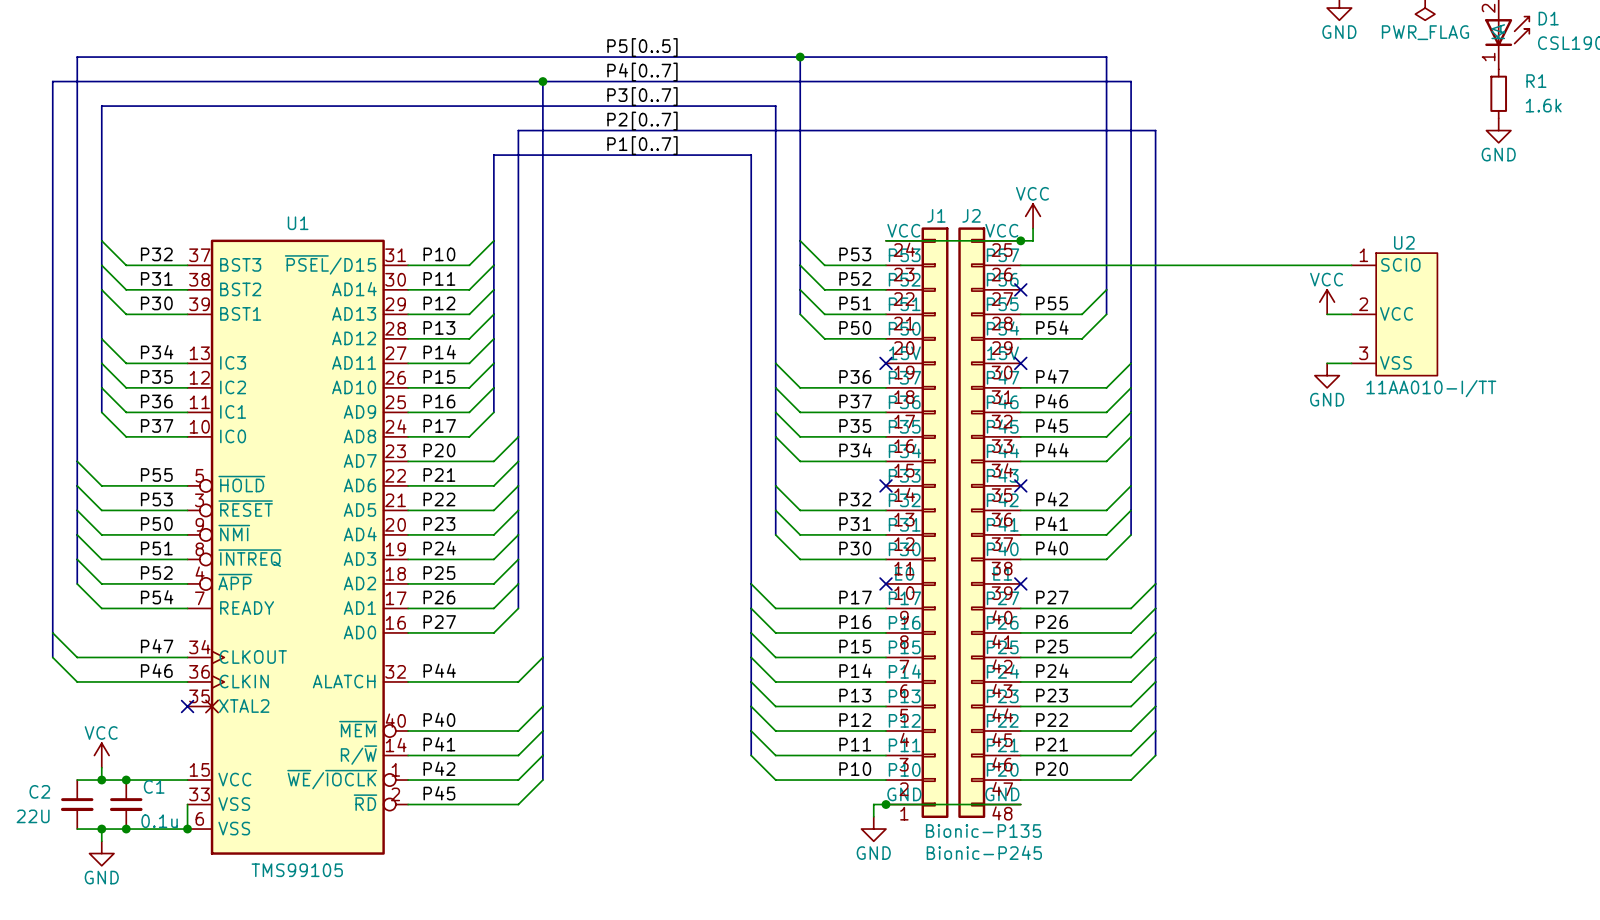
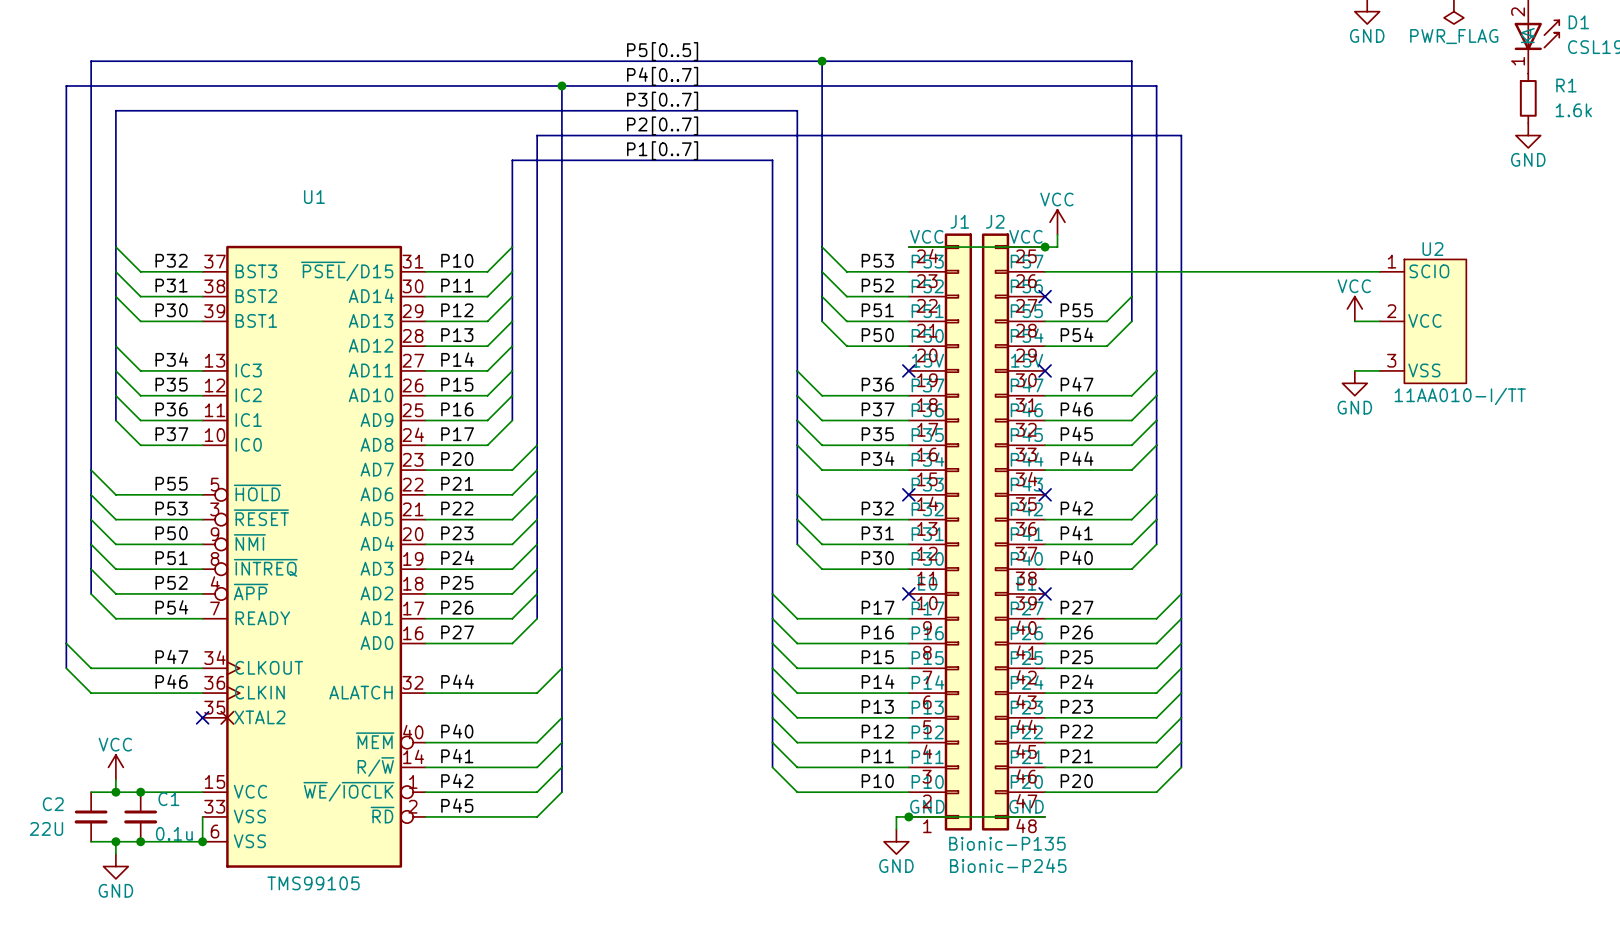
U1 name position: U1 (298, 223) -> U1 (314, 197)

